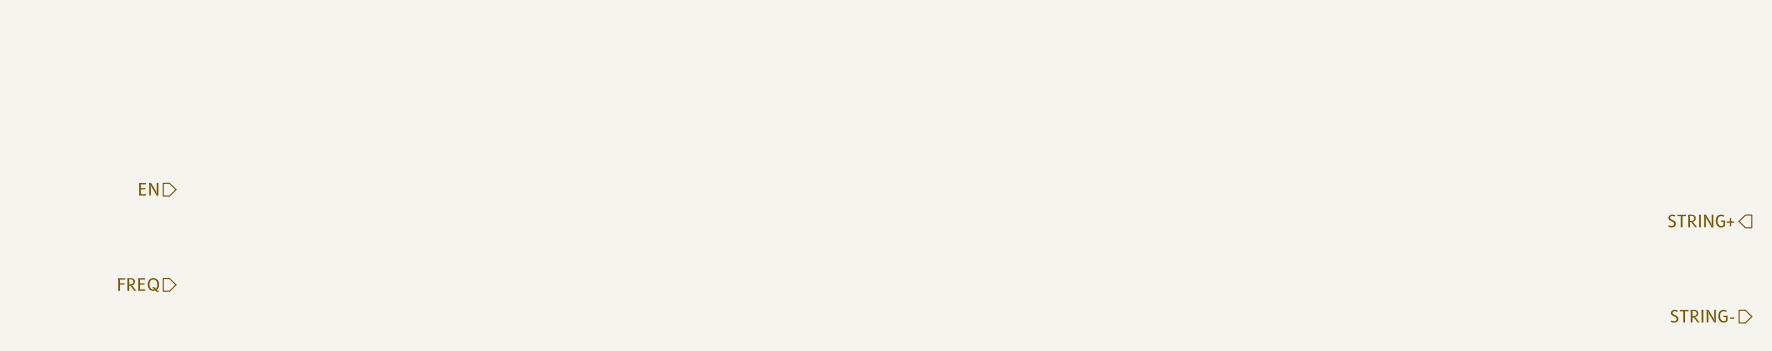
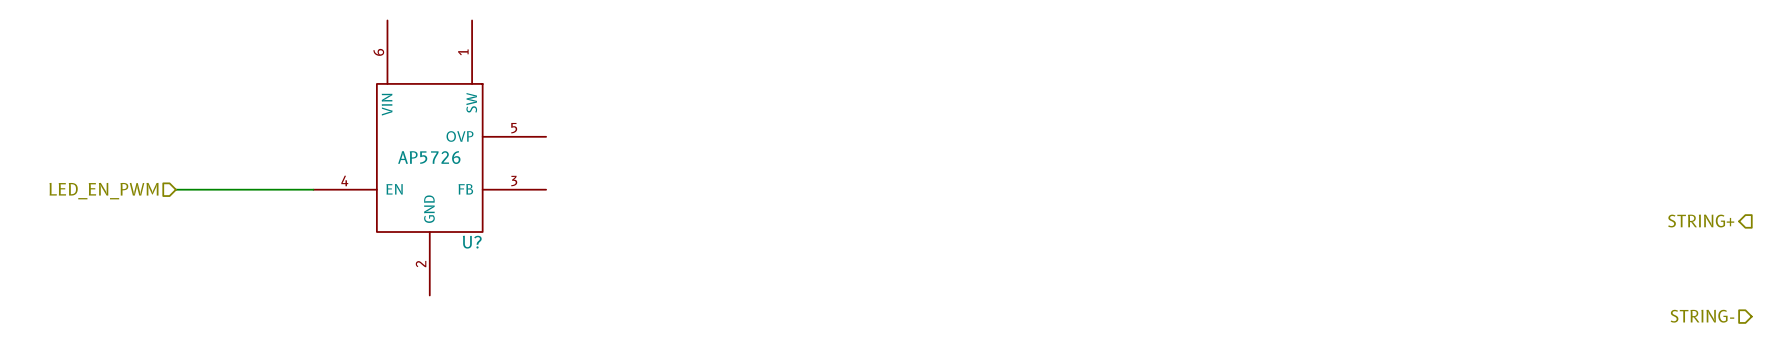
U?: none -> AP5726 (429, 157)
hierarchical label: EN (148, 189) -> LED_EN_PWM (104, 191)
wire: none -> (175, 189) (313, 189)
hierarchical label: FREQ (138, 285) -> none

